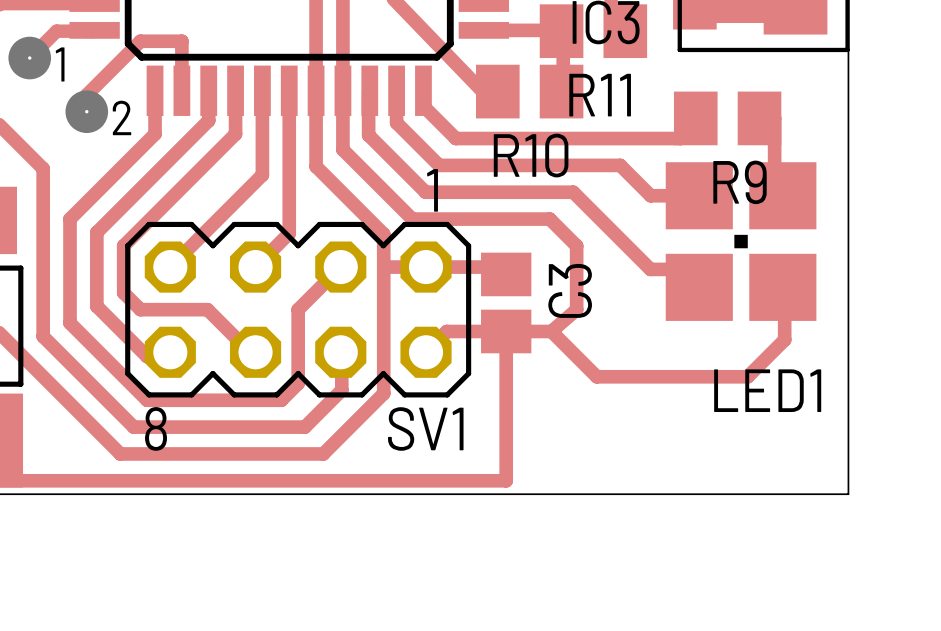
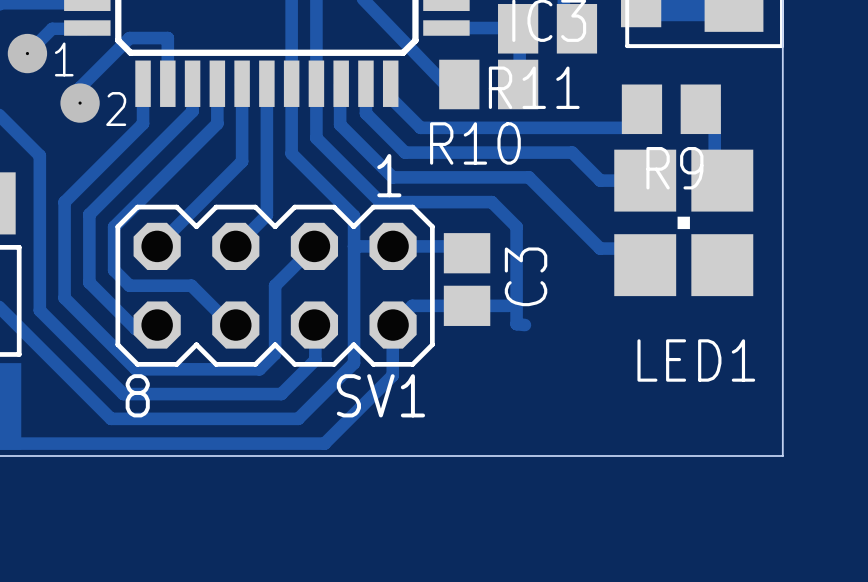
track: (533, 219) (549, 219) (576, 245) (576, 309) (551, 331) (596, 376) (747, 376) (784, 339) (784, 287) -> (491, 202) (516, 226) (516, 324) (524, 325)
track: (506, 345) (506, 480) (351, 480) -> (392, 325) (392, 375) (324, 443)

